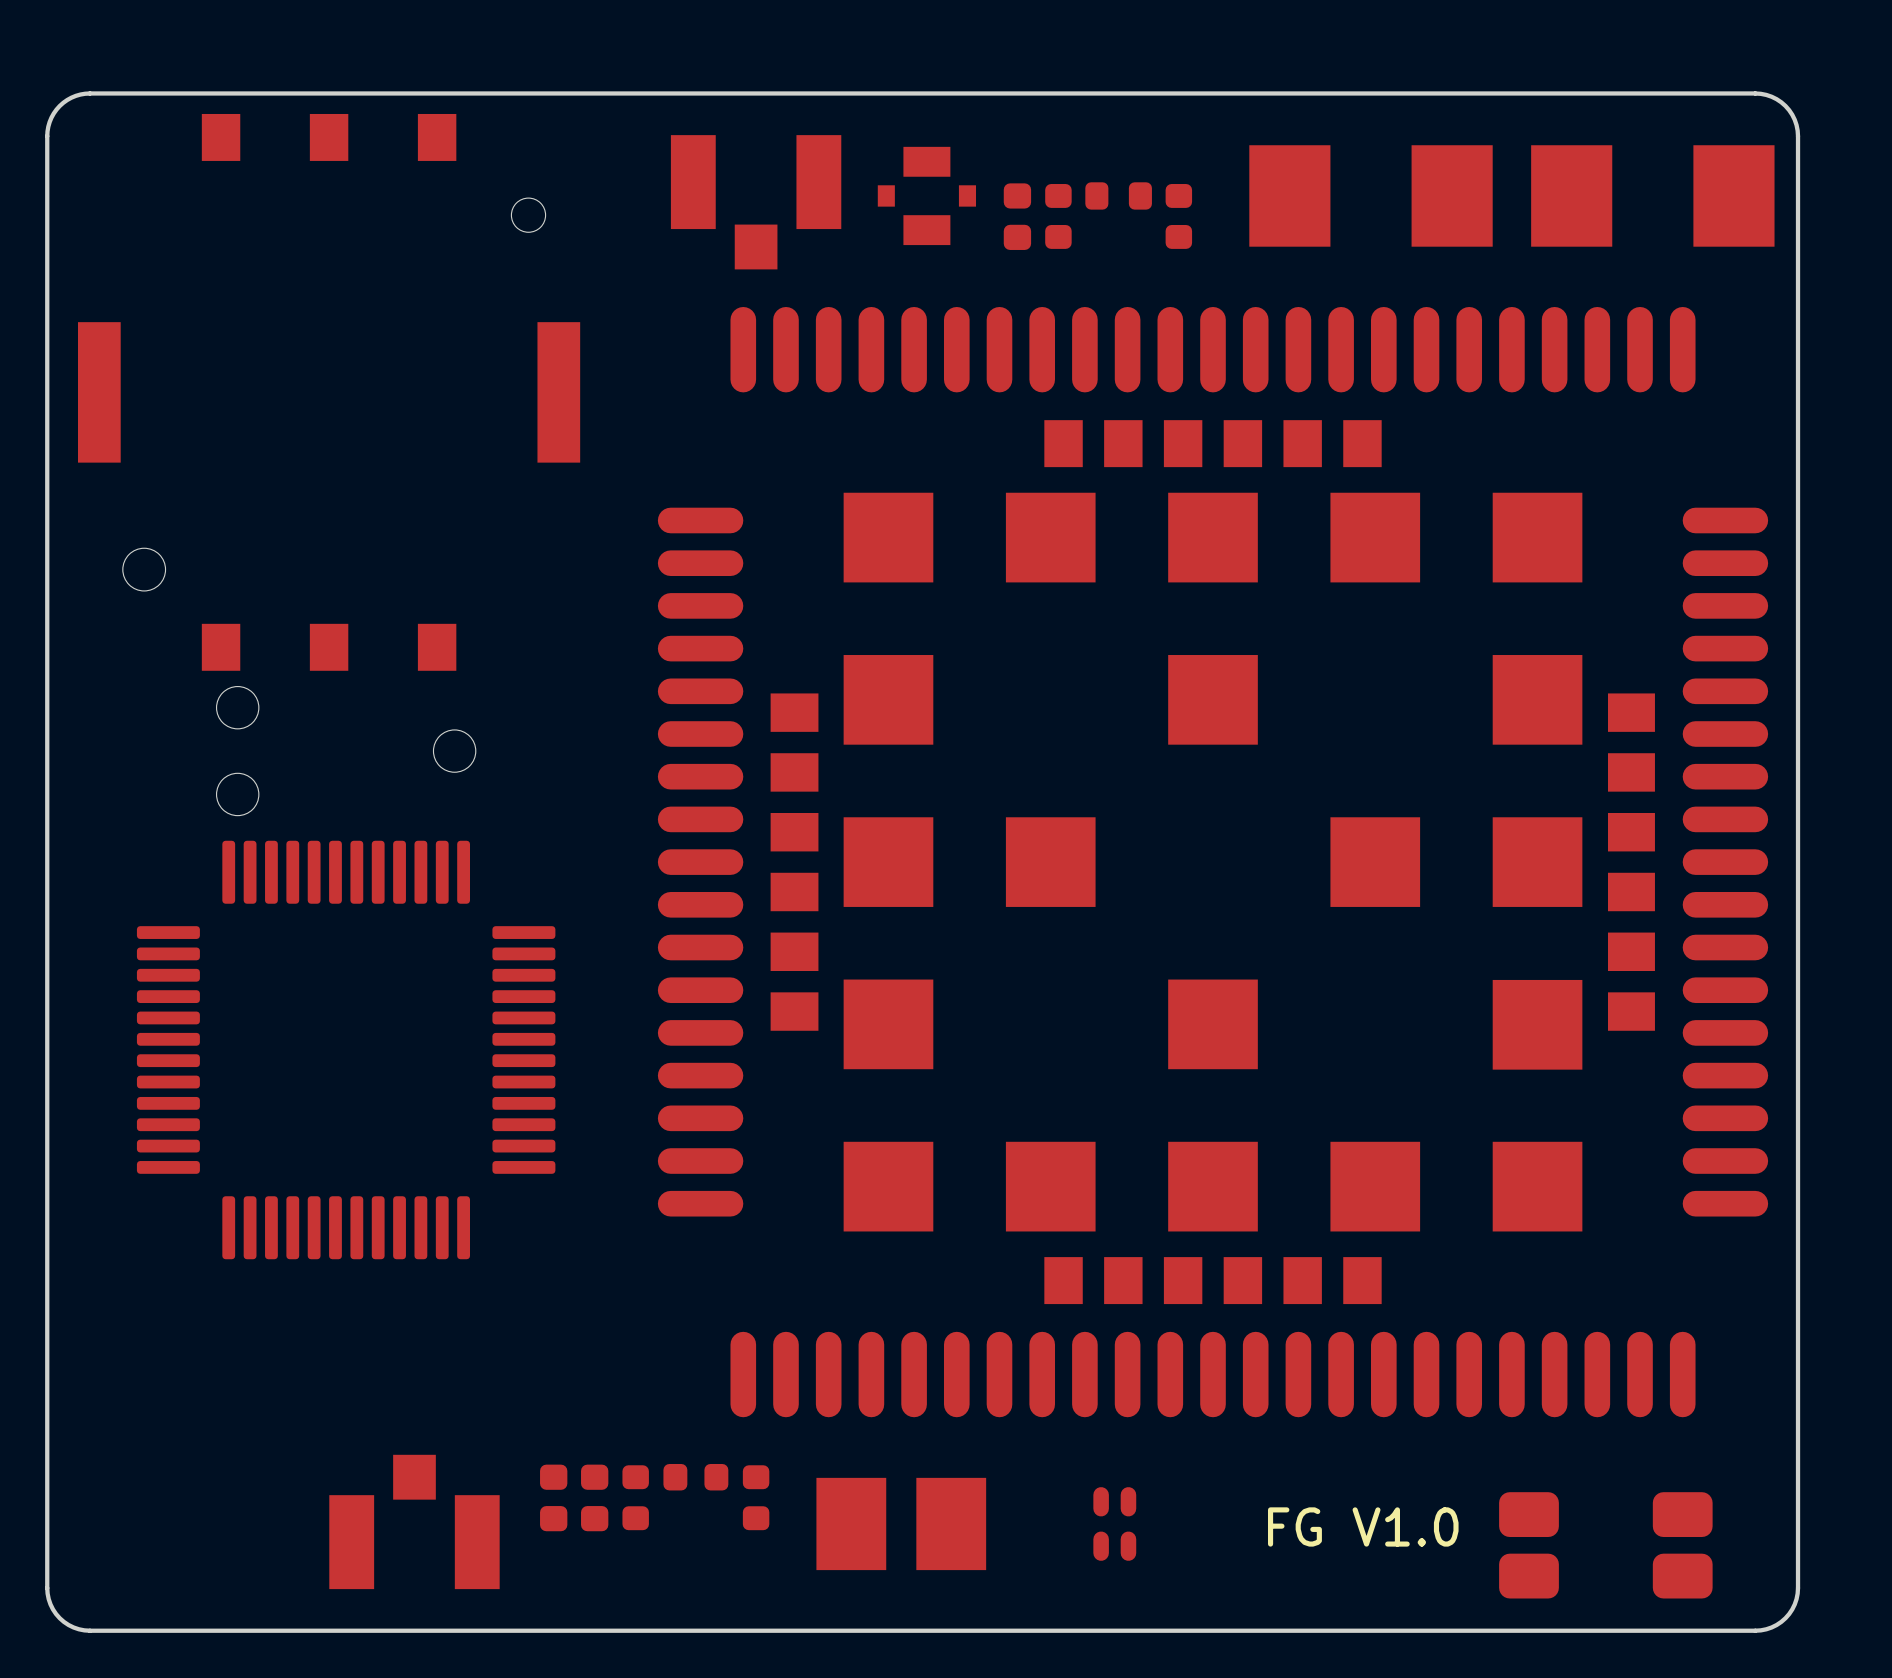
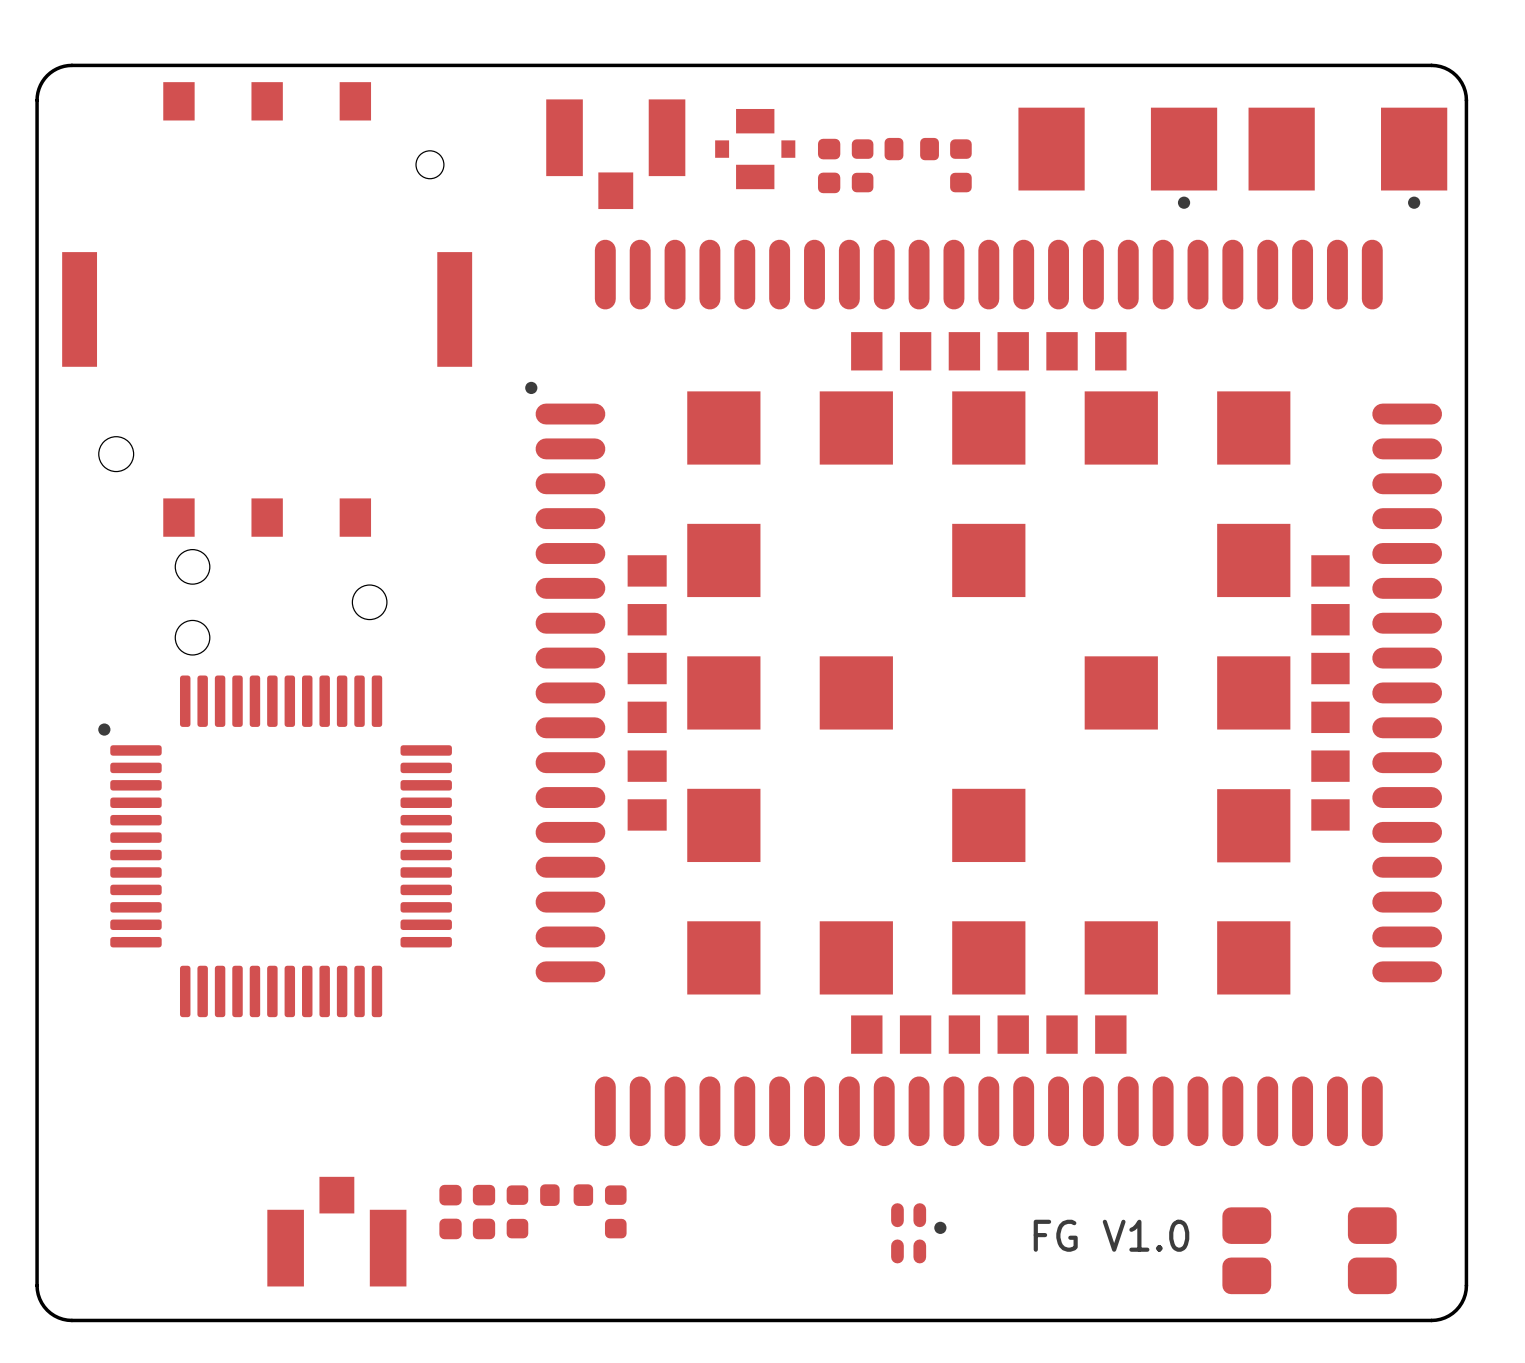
drawing: none -> [1177, 196, 1191, 209]
drawing: none -> [1408, 196, 1421, 209]
drawing: none -> [525, 381, 538, 395]
drawing: none -> [98, 723, 111, 736]
drawing: none -> [934, 1221, 947, 1234]
part: (901, 1523) -> none

